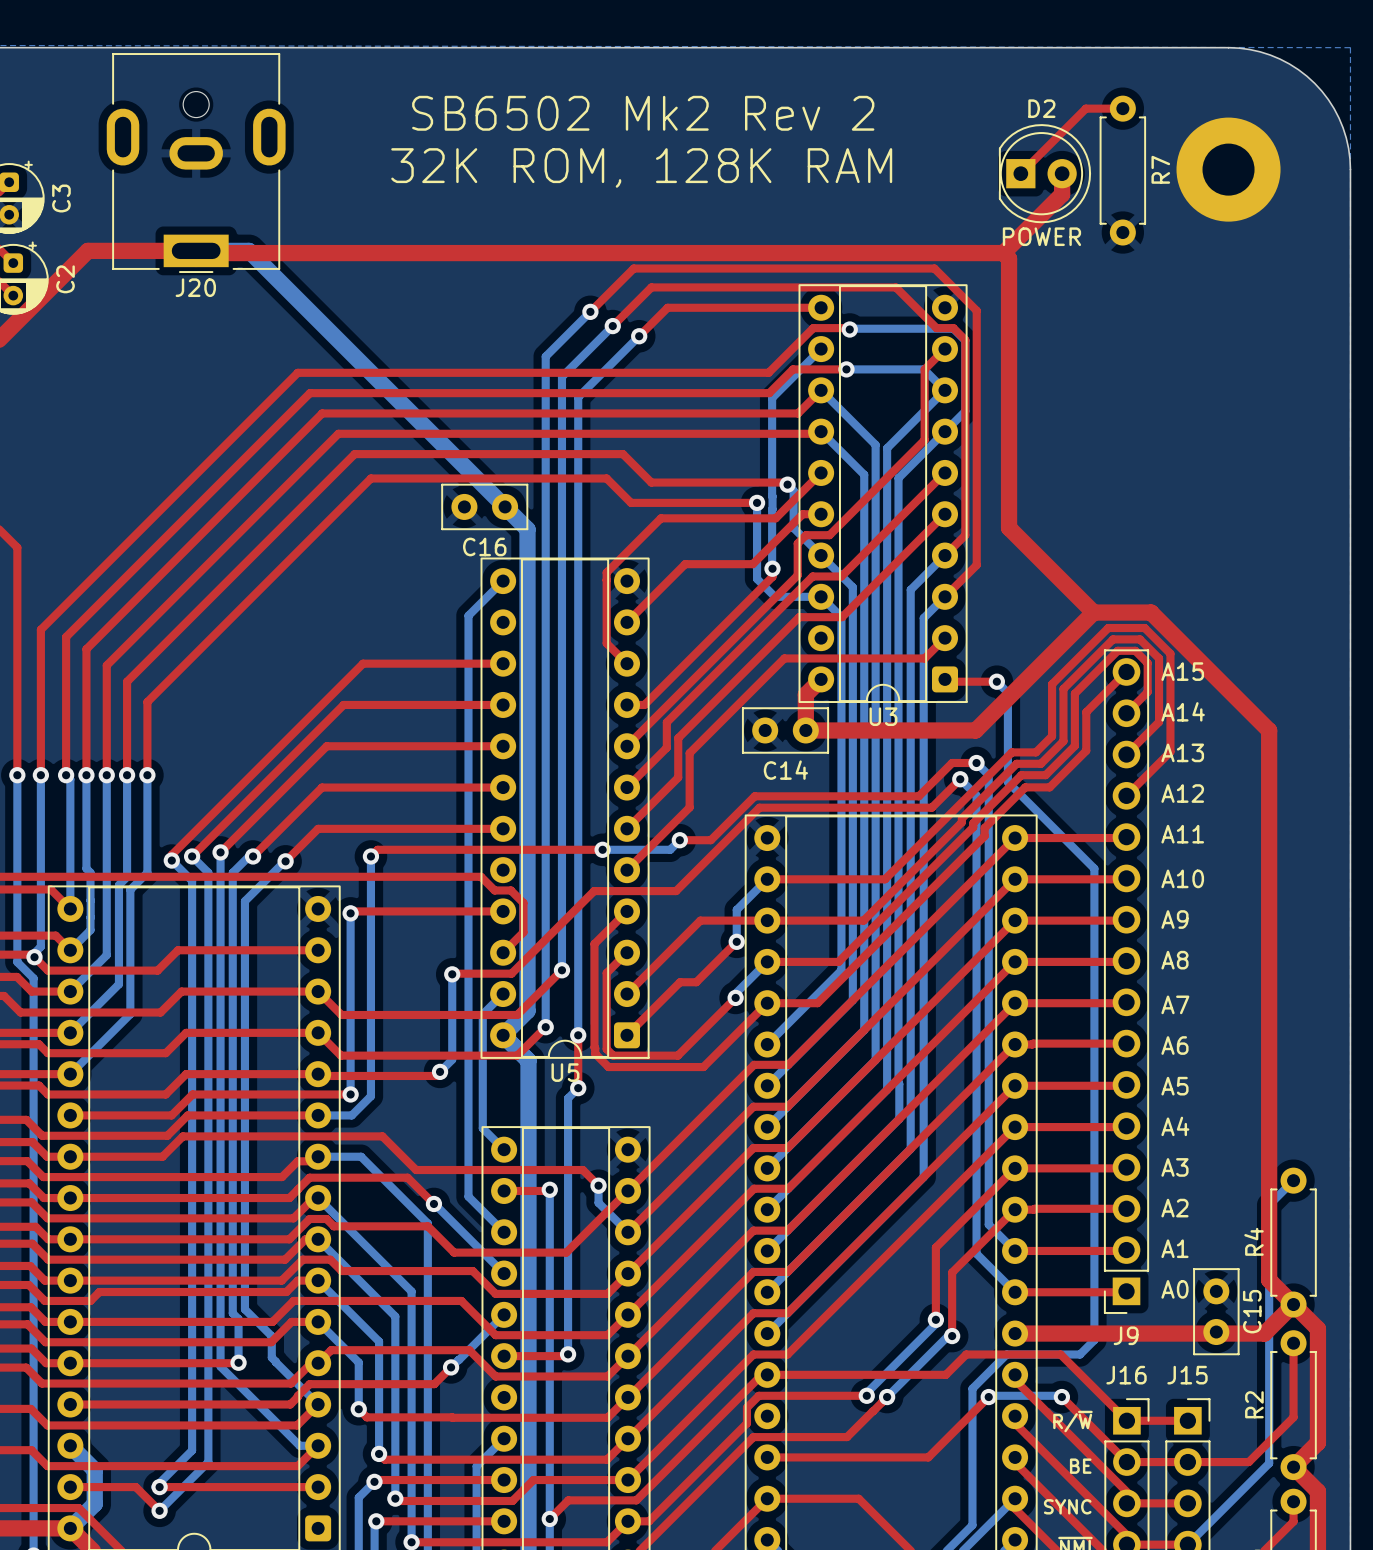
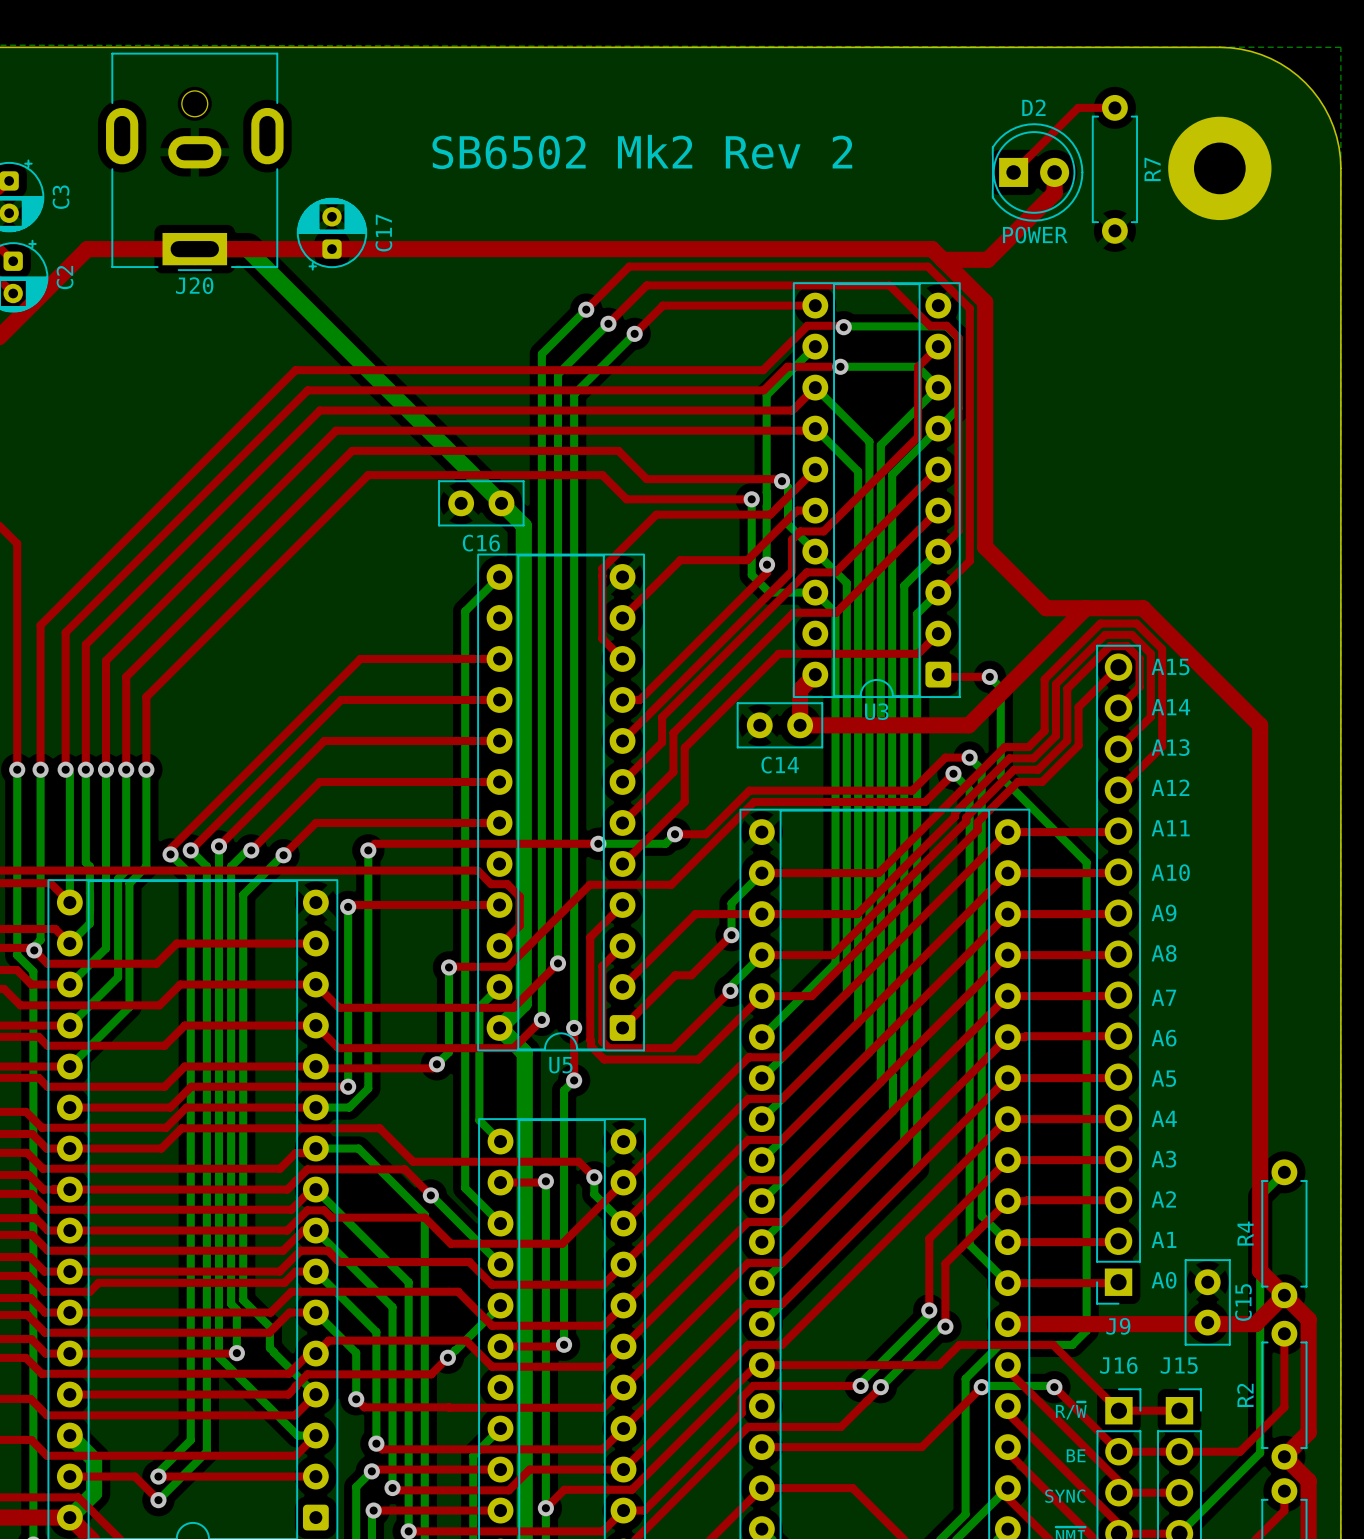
text: SB6502 Mk2 Rev 2 (643, 113) -> none
text: 32K ROM, 128K RAM (641, 167) -> SB6502 Mk2 Rev 2 (642, 151)
C17: none -> (332, 234)
top track: (202, 253) (1003, 253) (1009, 258) (1009, 527) (1093, 612) -> (194, 249) (932, 249) (985, 302) (985, 547) (1046, 608) (1085, 608)
top track: none -> (996, 251) (987, 259) (942, 259)

